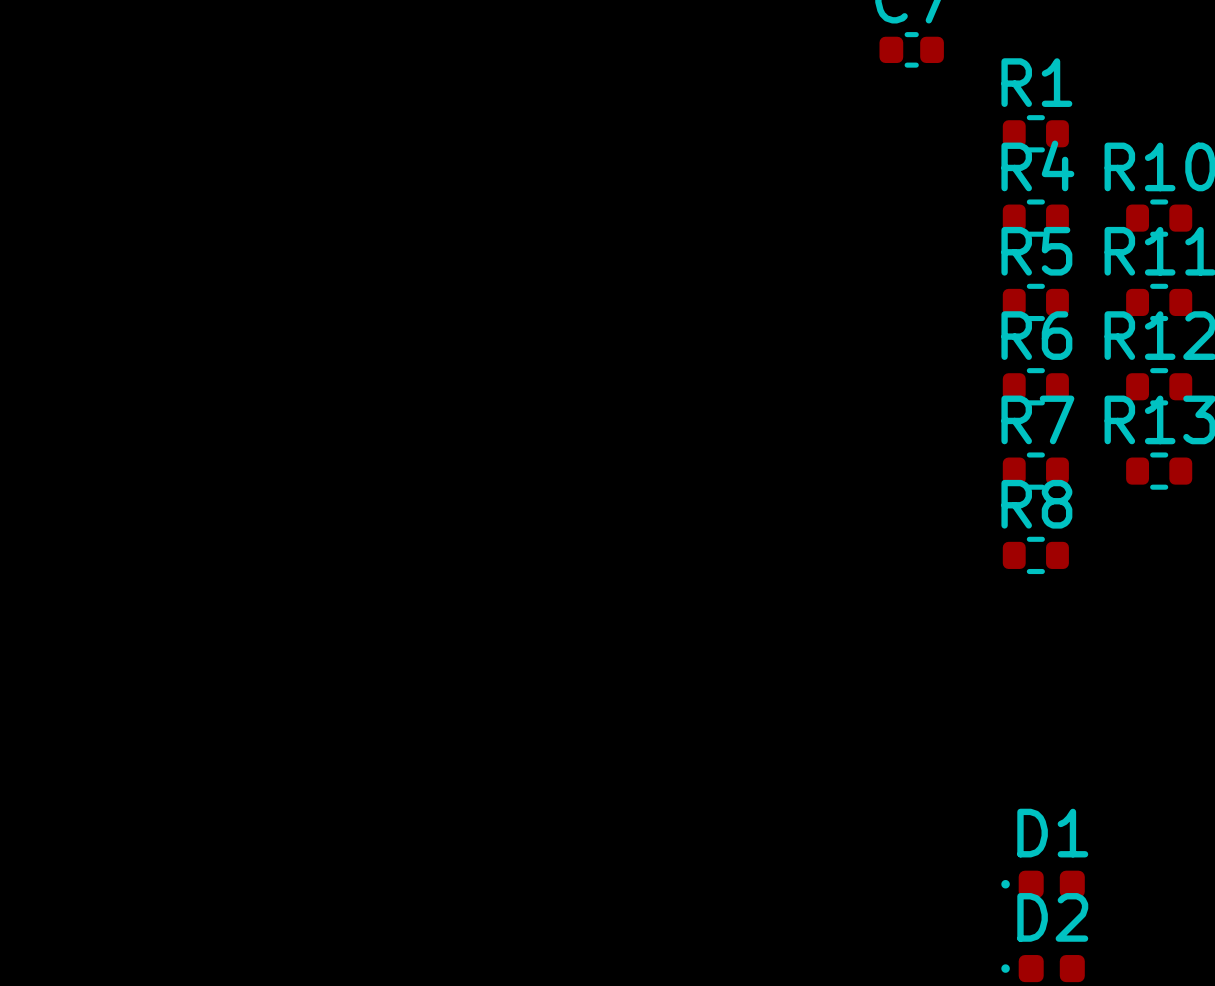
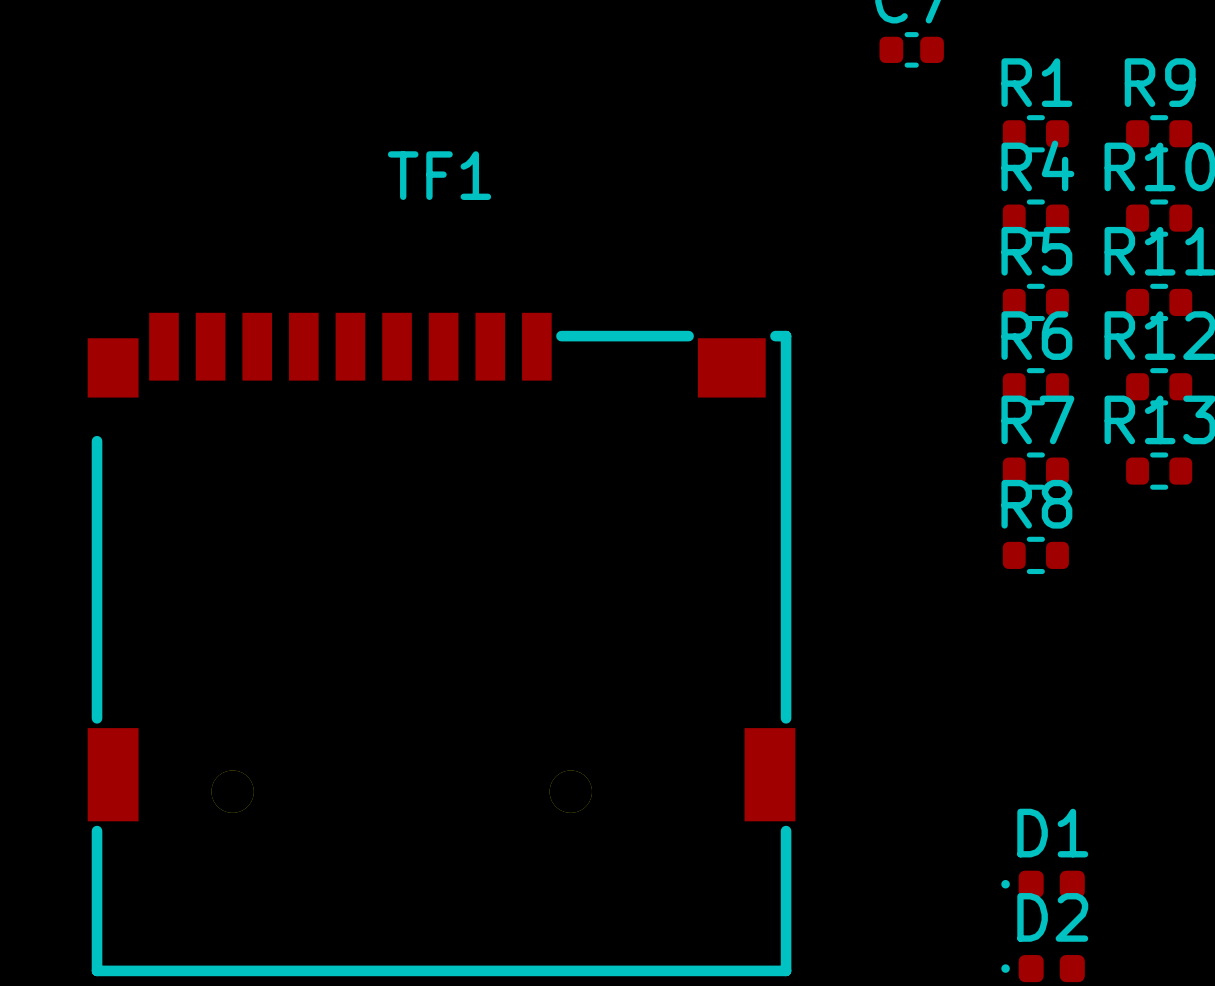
R9: none -> (1159, 133)
TF1: none -> (441, 644)

